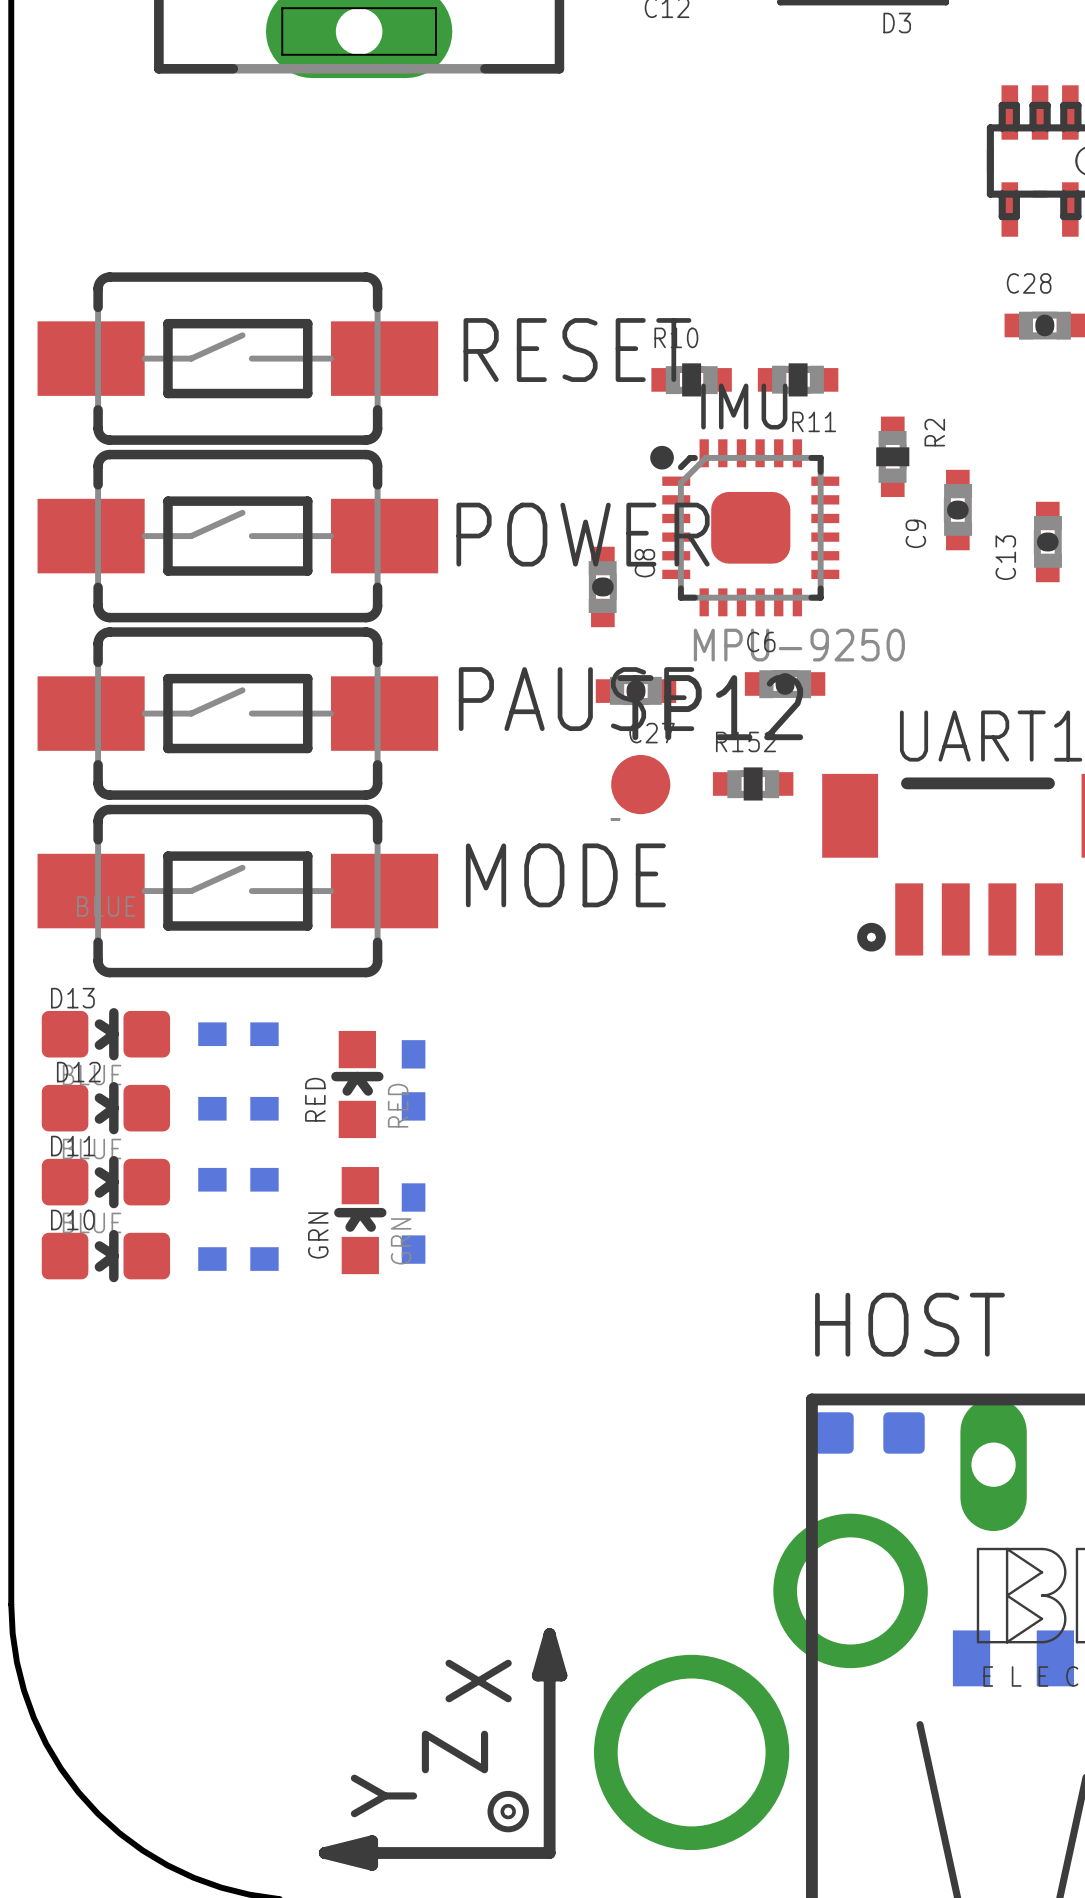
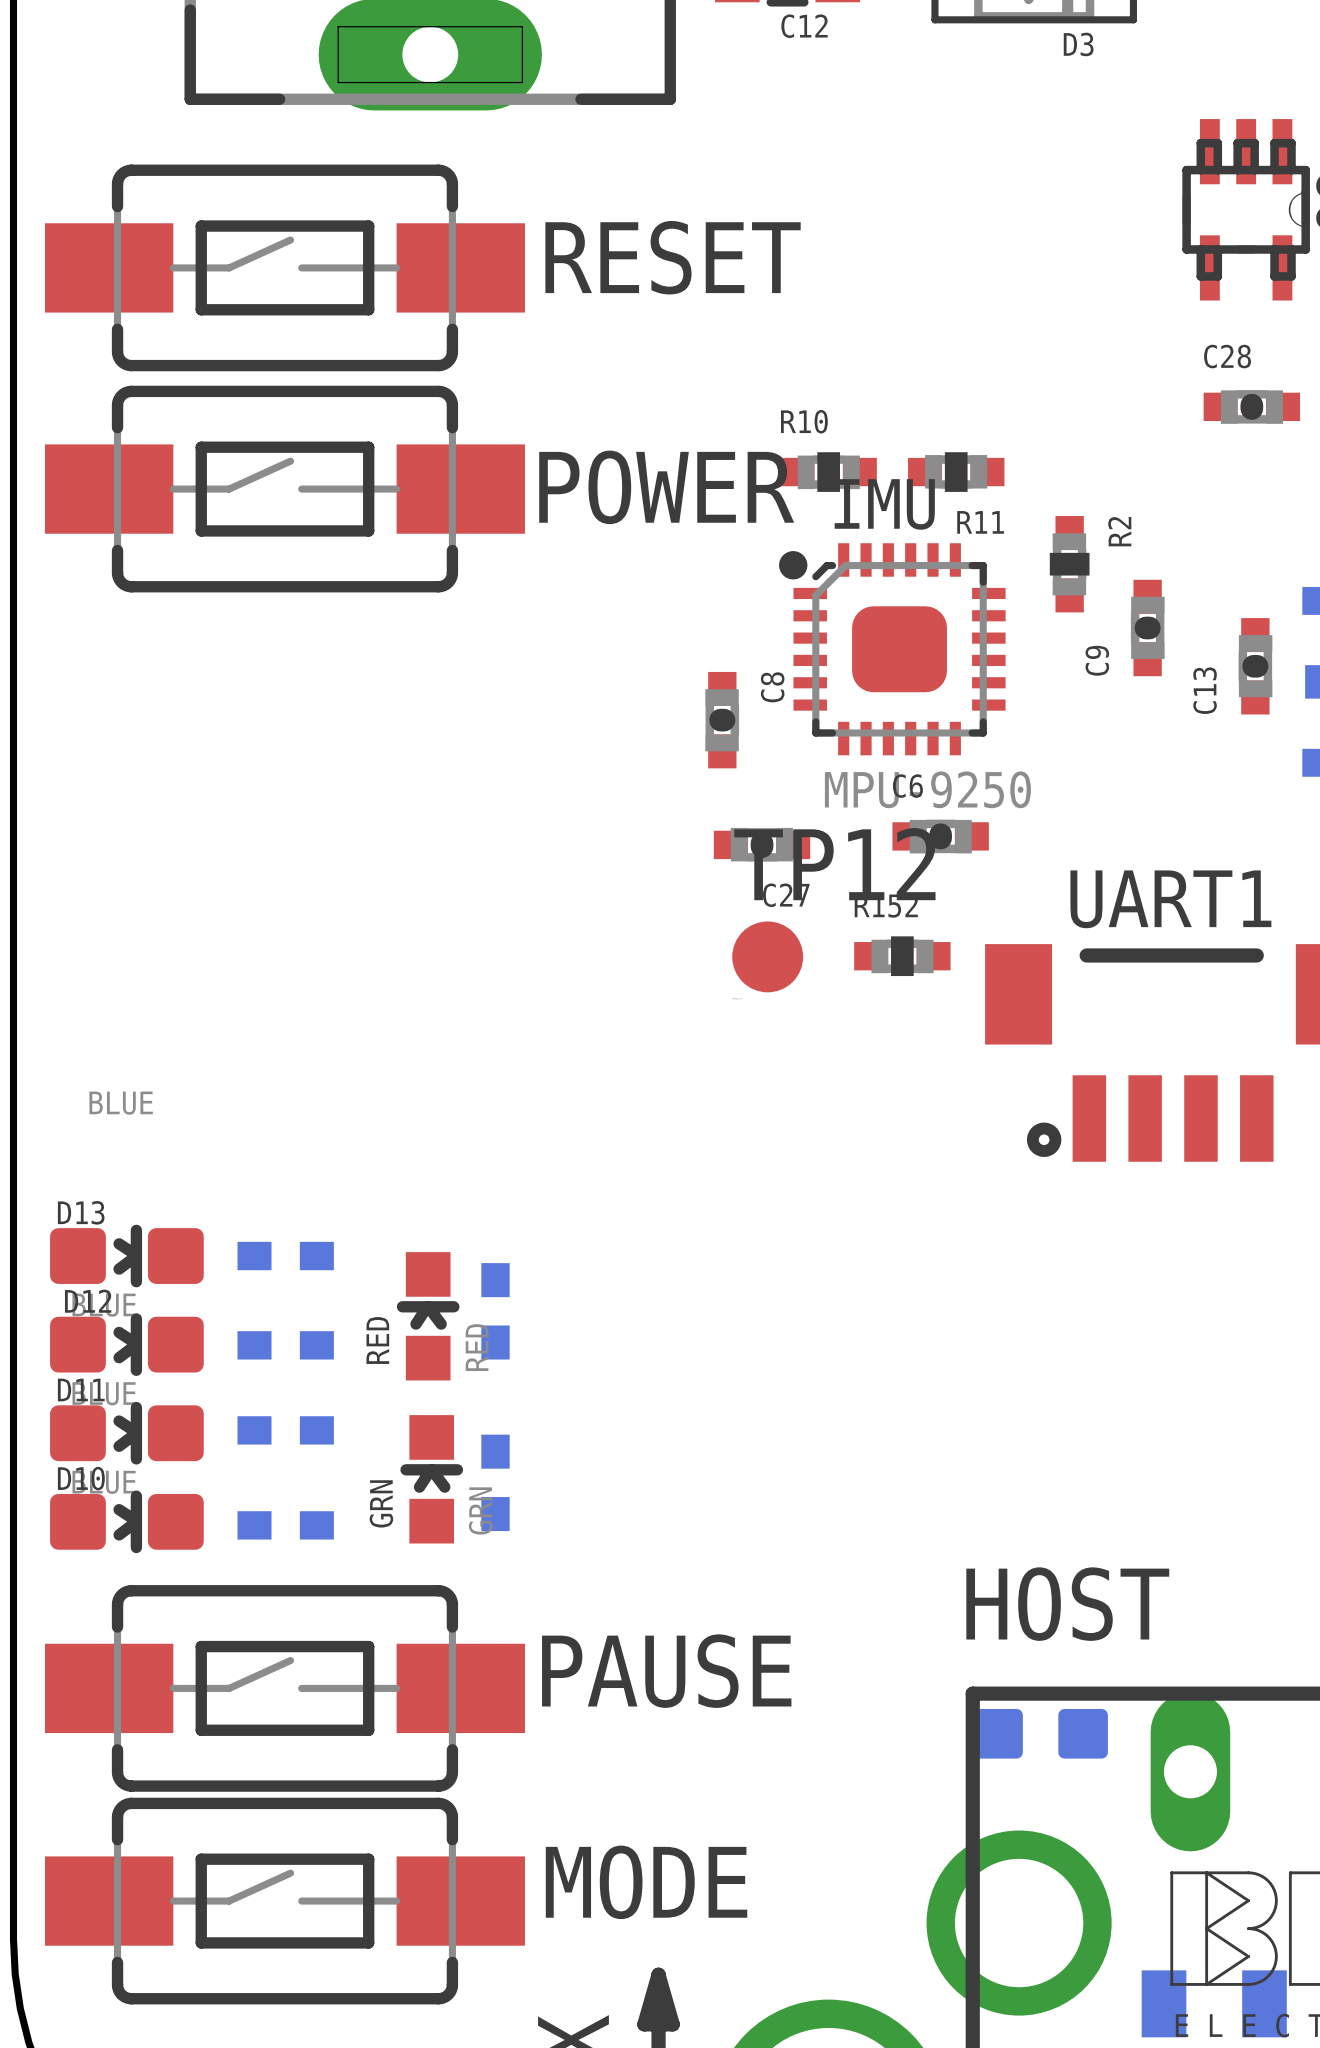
RESET: none -> (284, 267)
RESET name: RESET (577, 350) -> POWER (666, 487)
RESET position: (237, 358) -> (284, 489)
POWER: (237, 536) -> none
PAUSE position: (237, 713) -> (284, 1688)
MODE position: (237, 891) -> (284, 1901)

